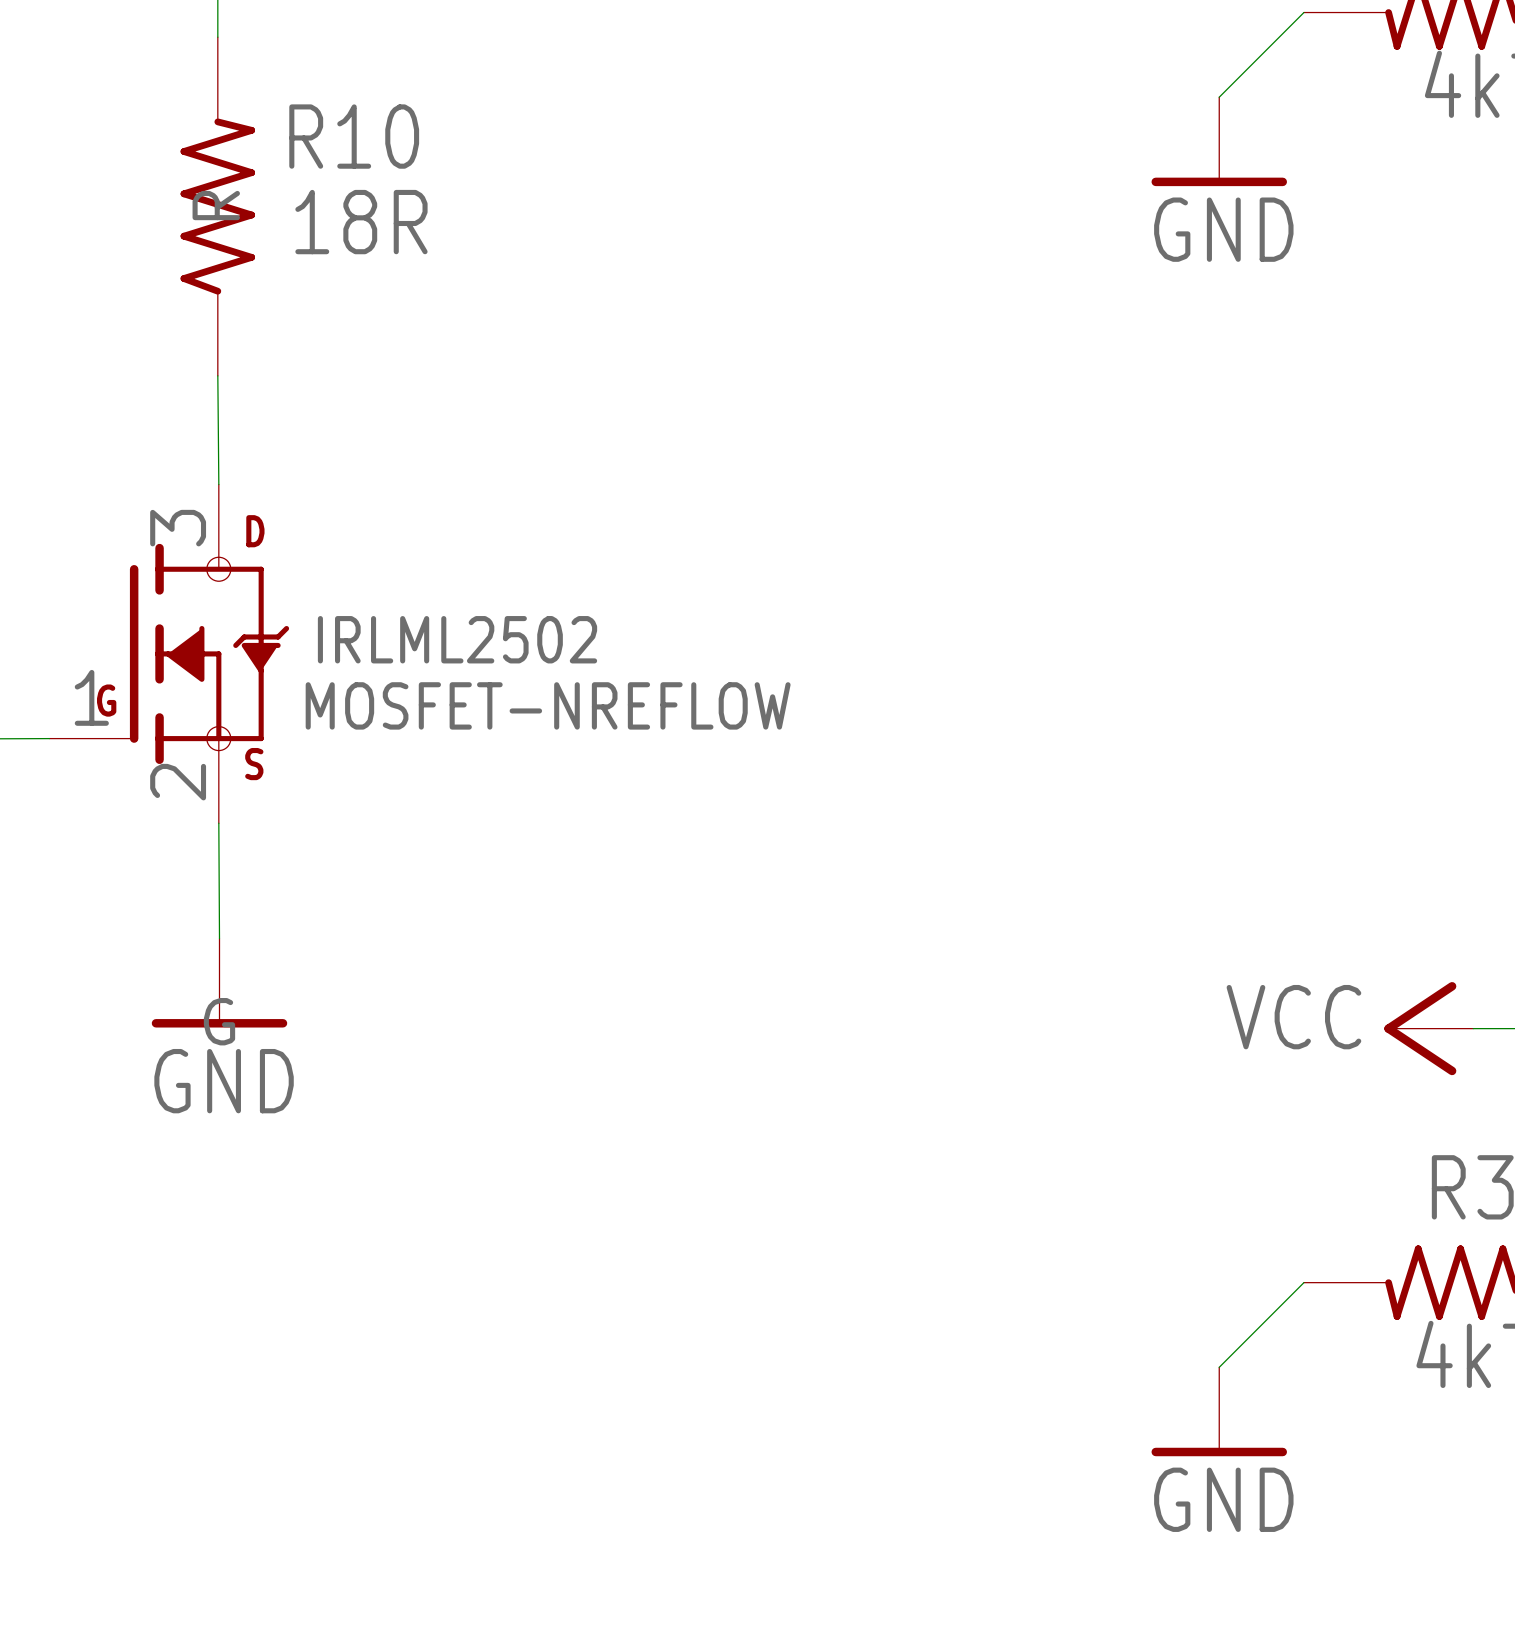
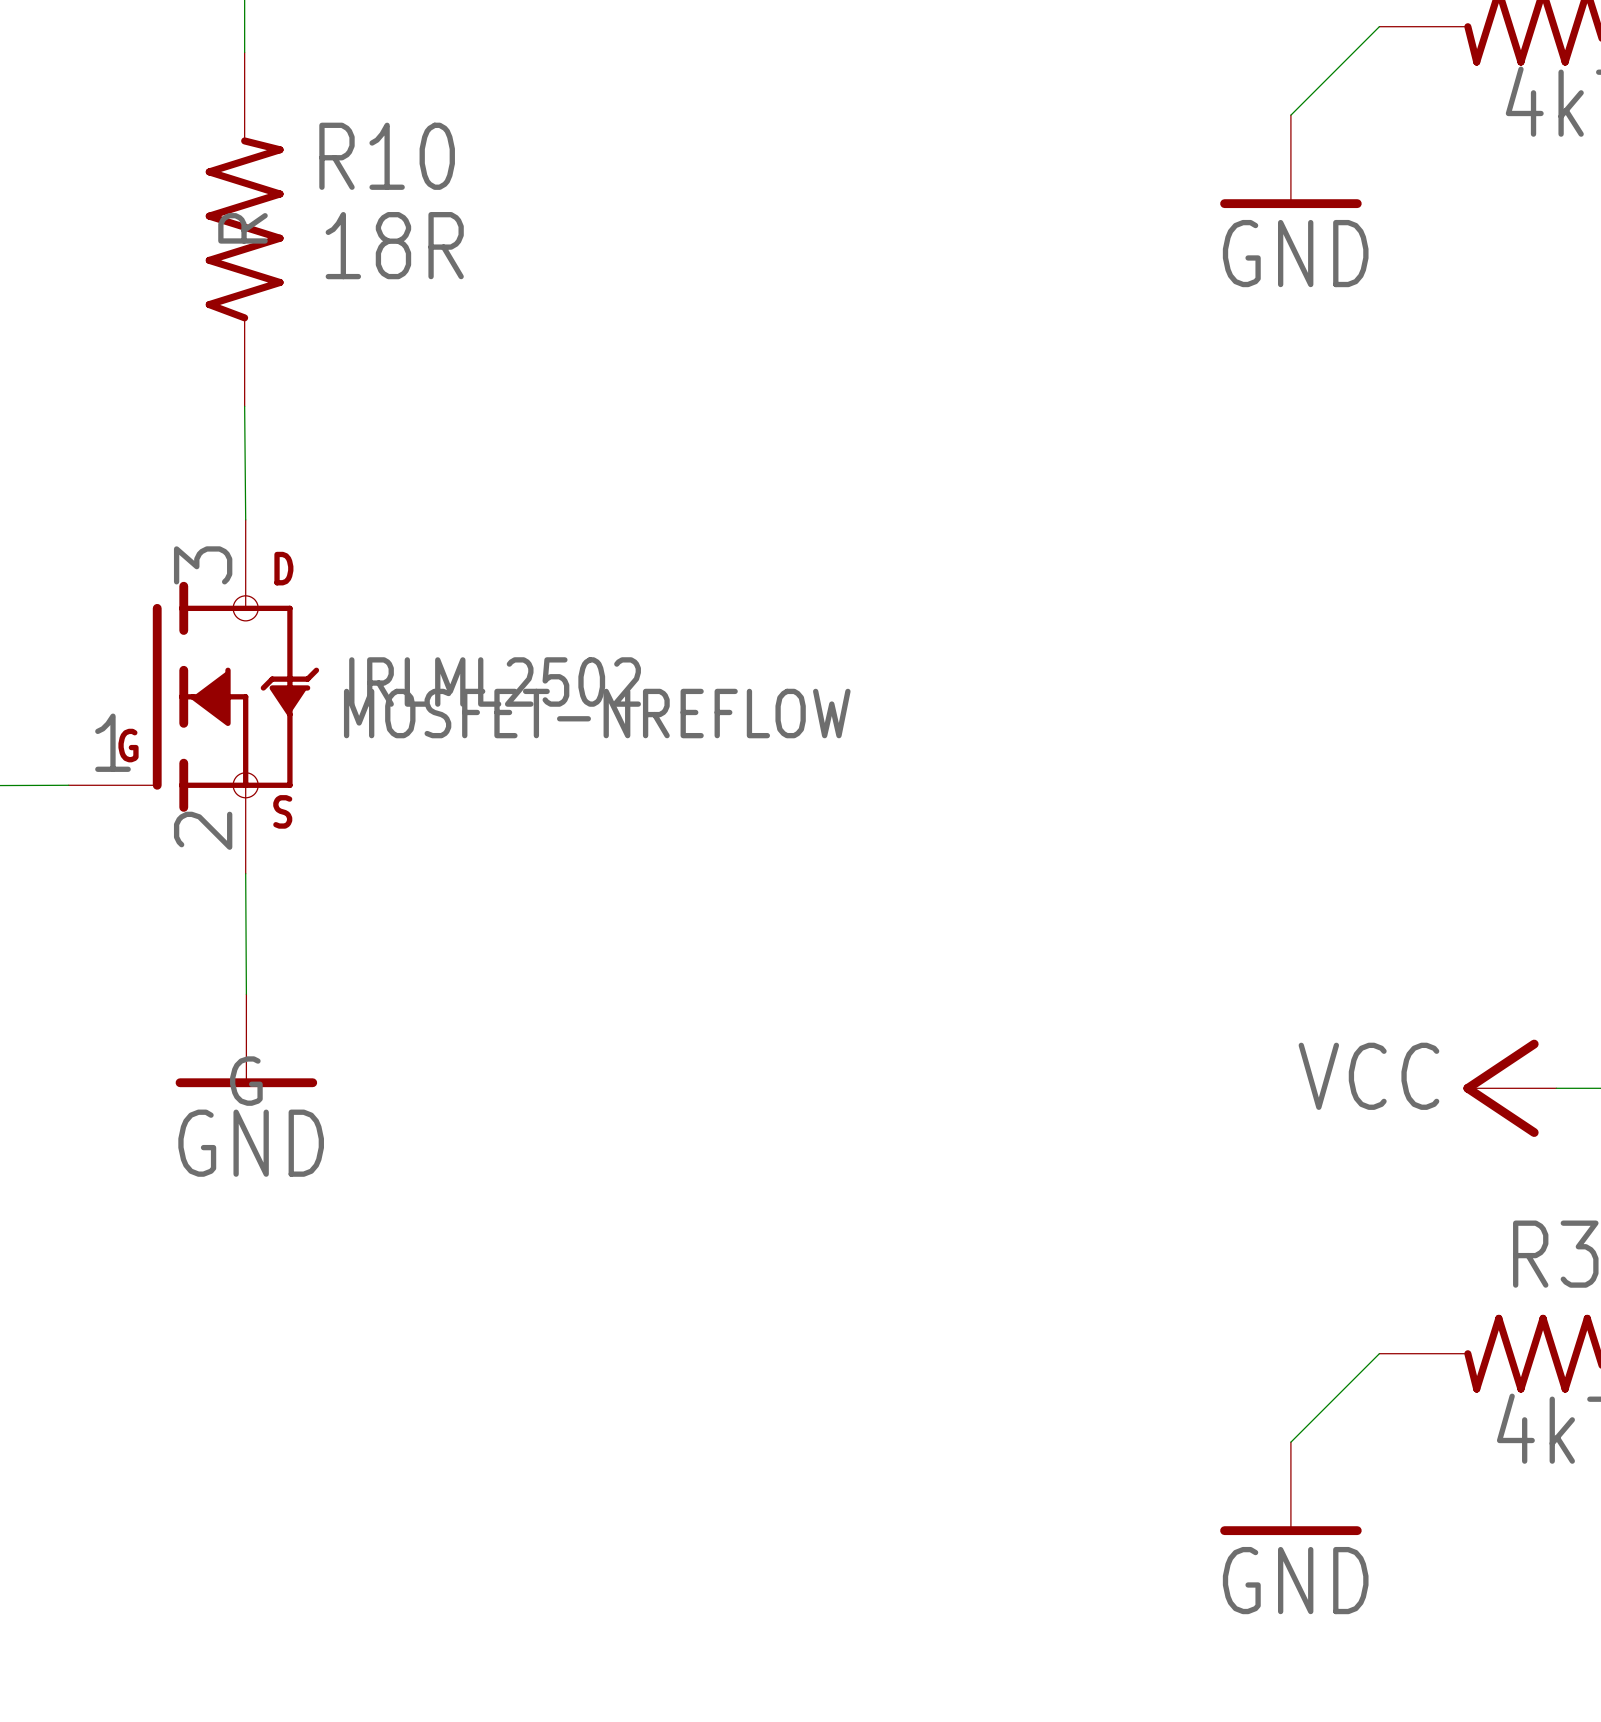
IRLML2502 value position: MOSFET-NREFLOW (548, 705) -> MOSFET-NREFLOW (597, 713)

